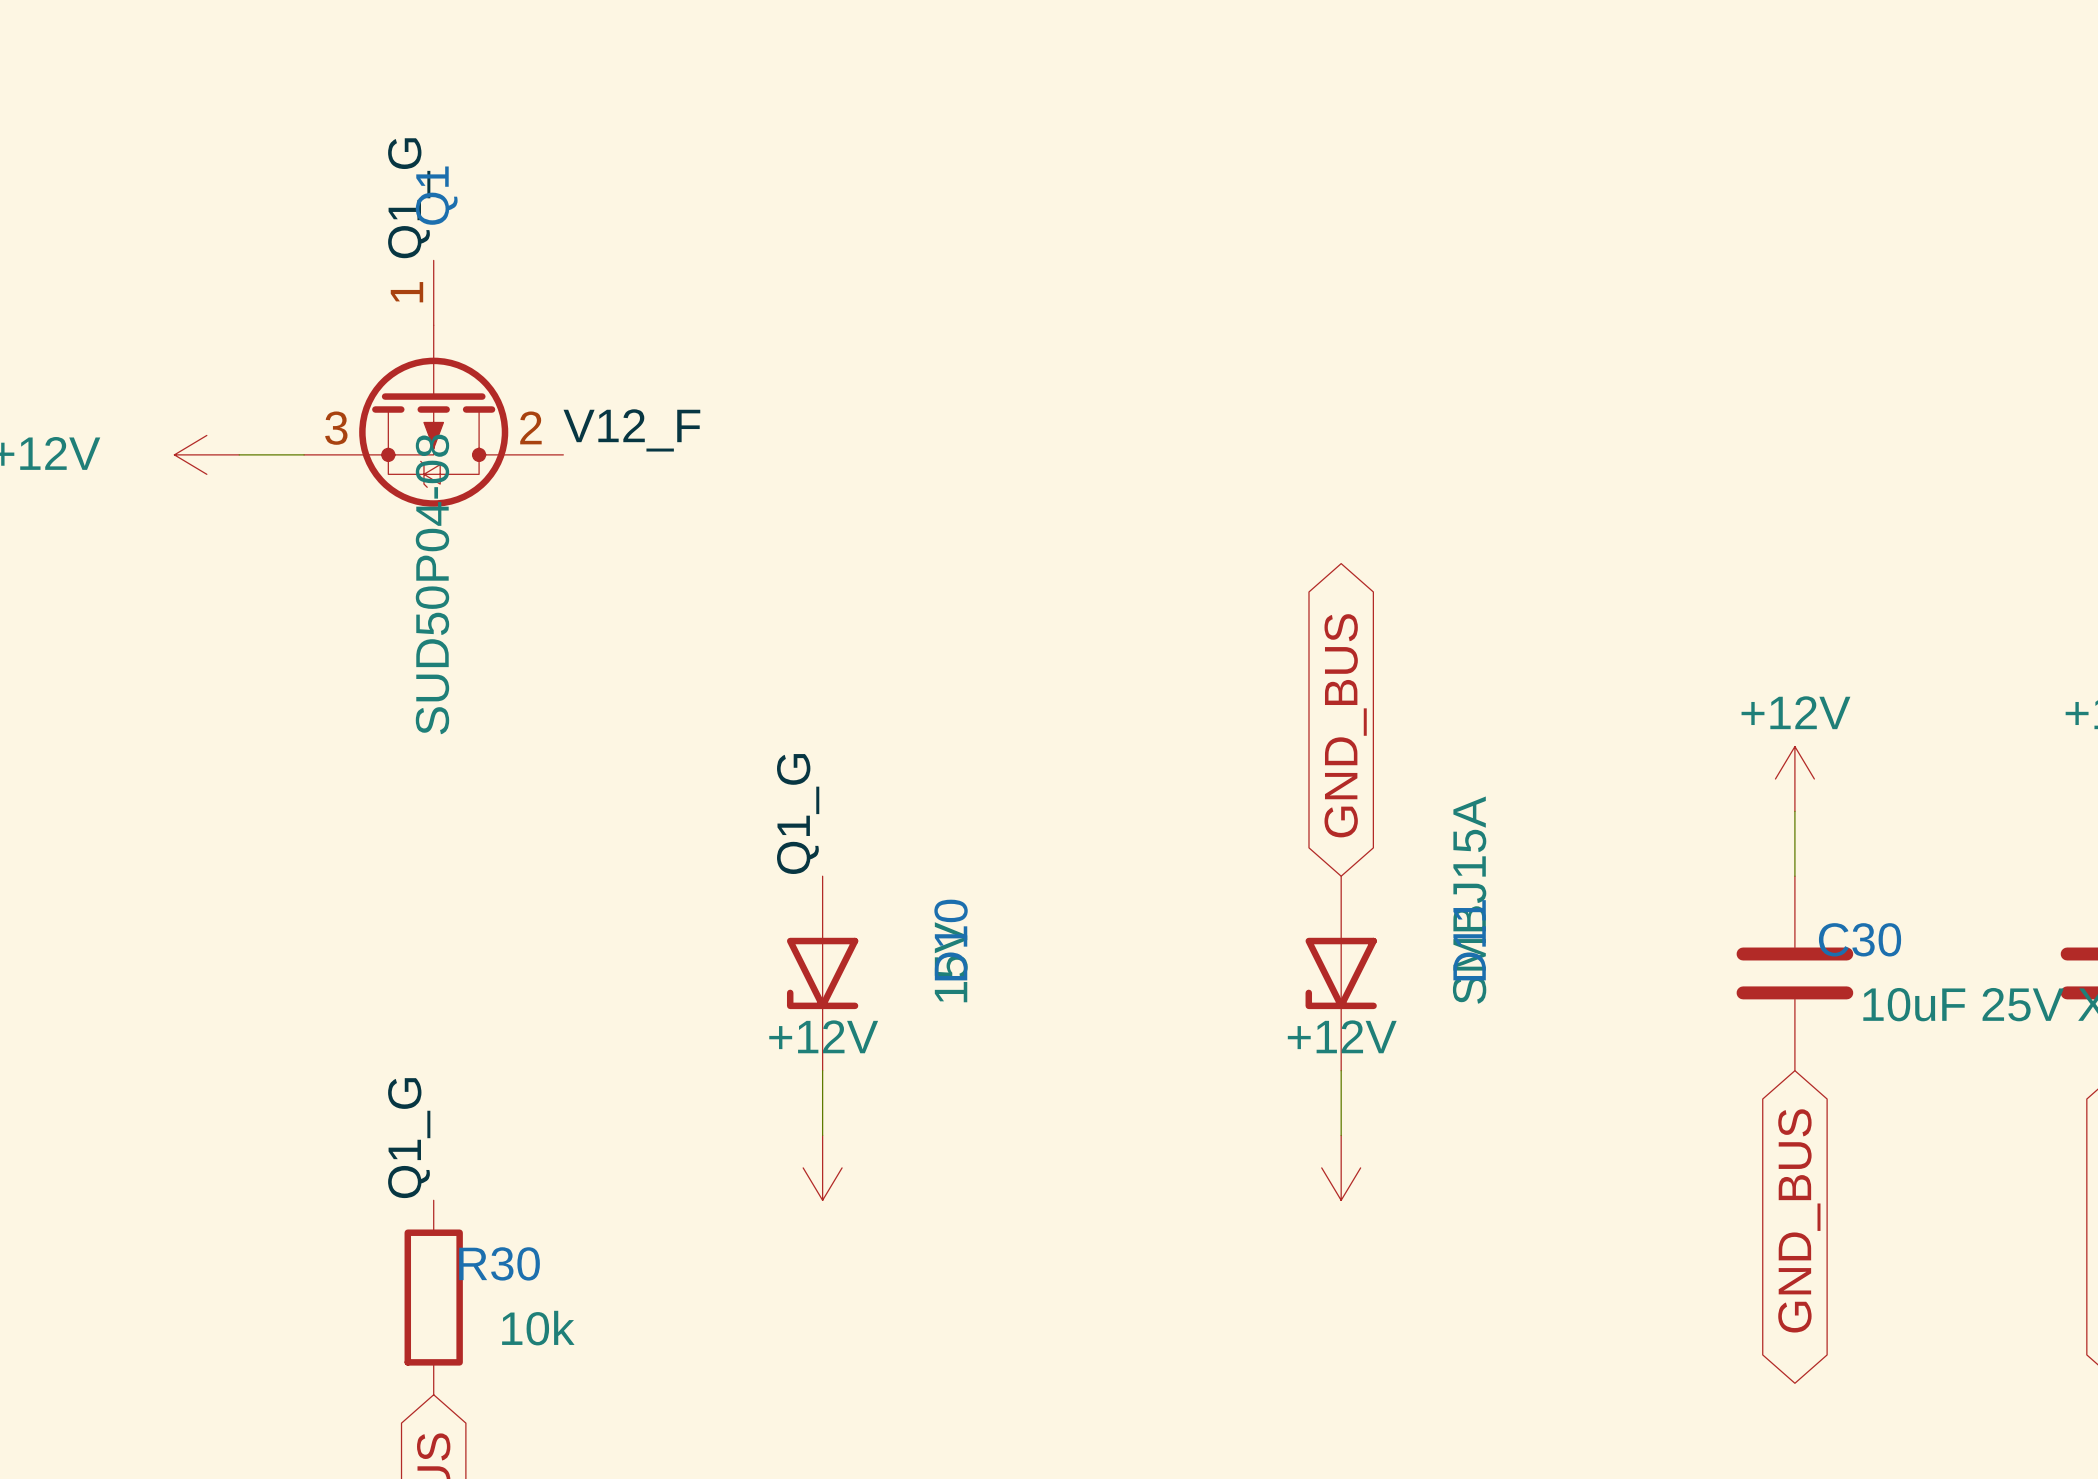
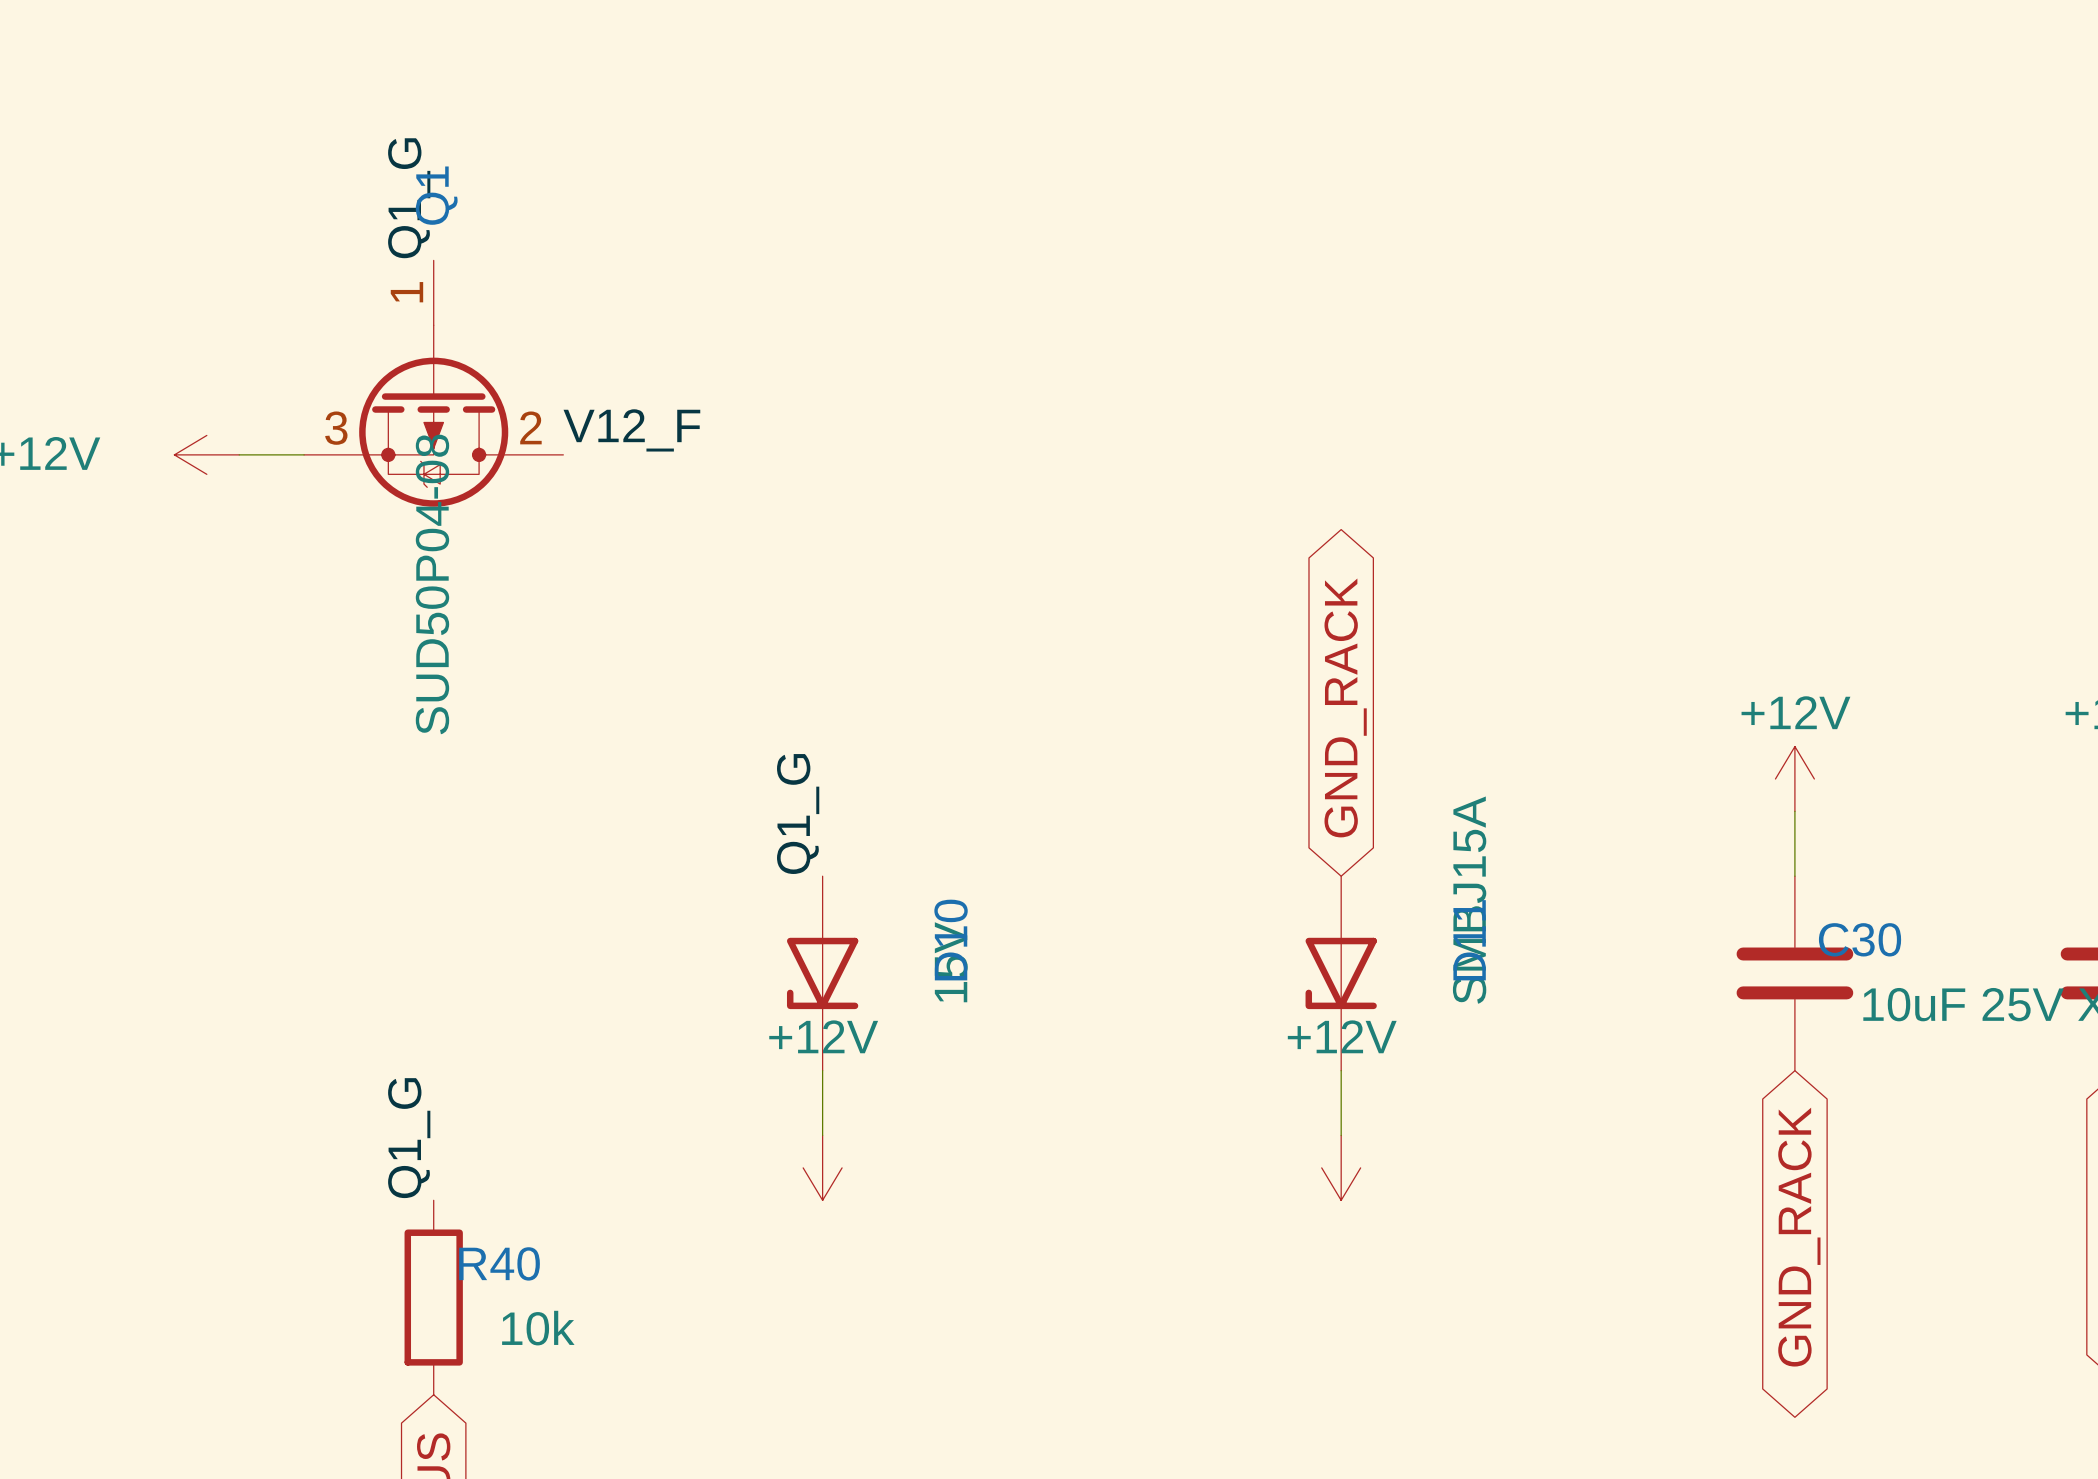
global label: GND_BUS (1345, 725) -> GND_RACK (1345, 707)
global label: GND_BUS (1799, 1220) -> GND_RACK (1799, 1237)
R30 name: R30 (499, 1263) -> R40 (499, 1263)

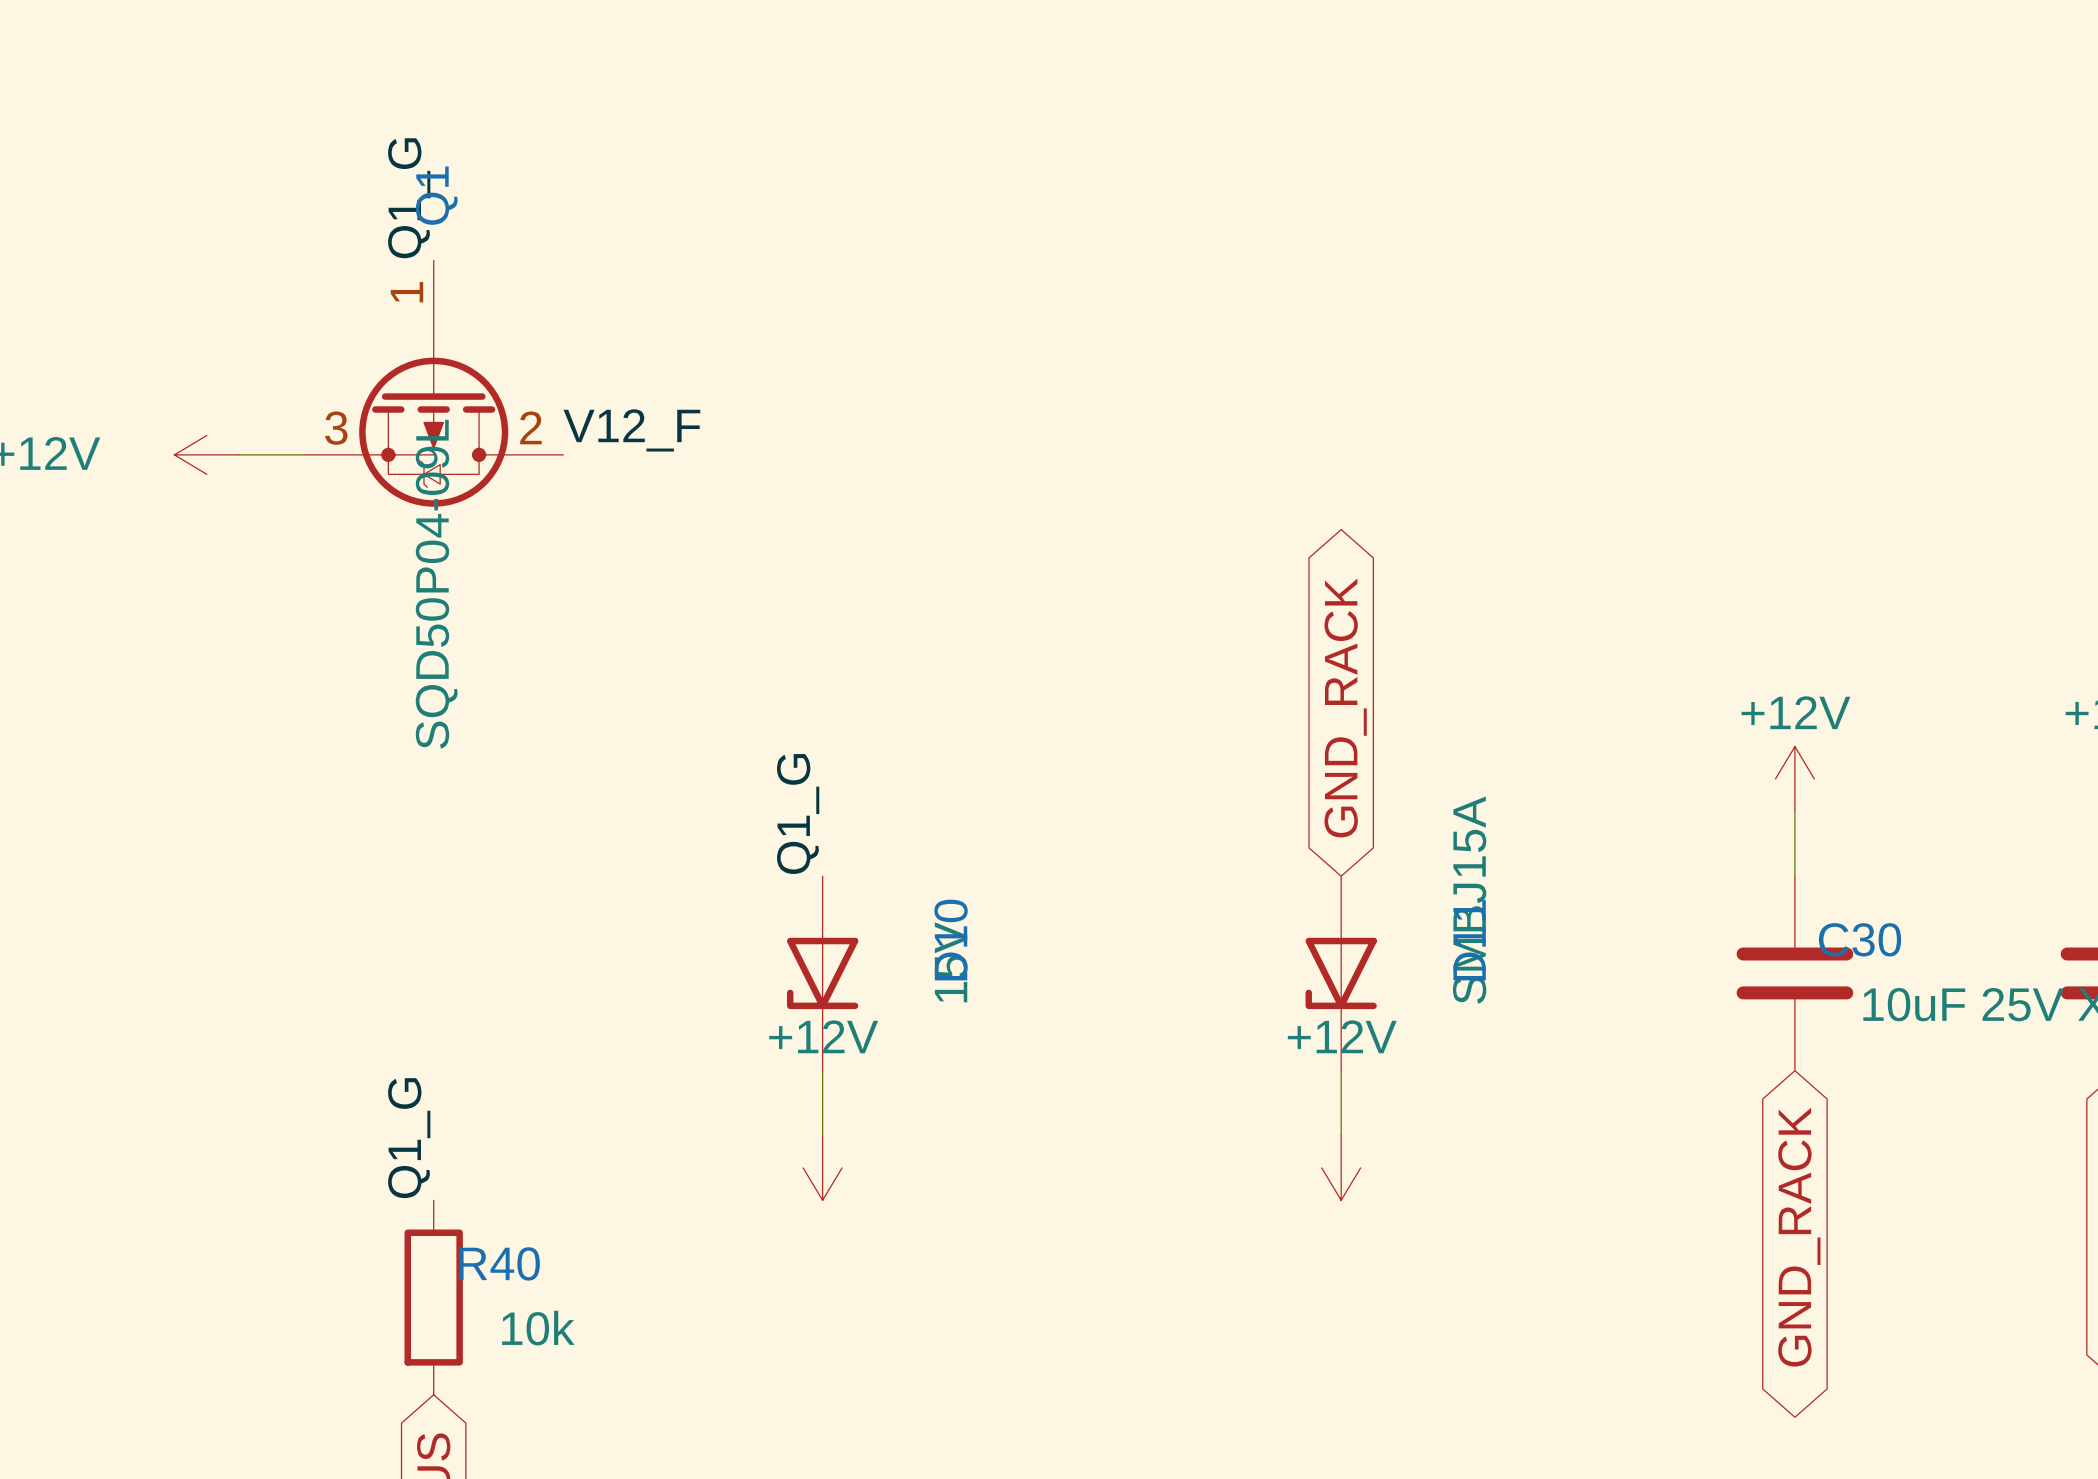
Q1 value: SUD50P04-08 (432, 584) -> SQD50P04-09L (436, 584)

